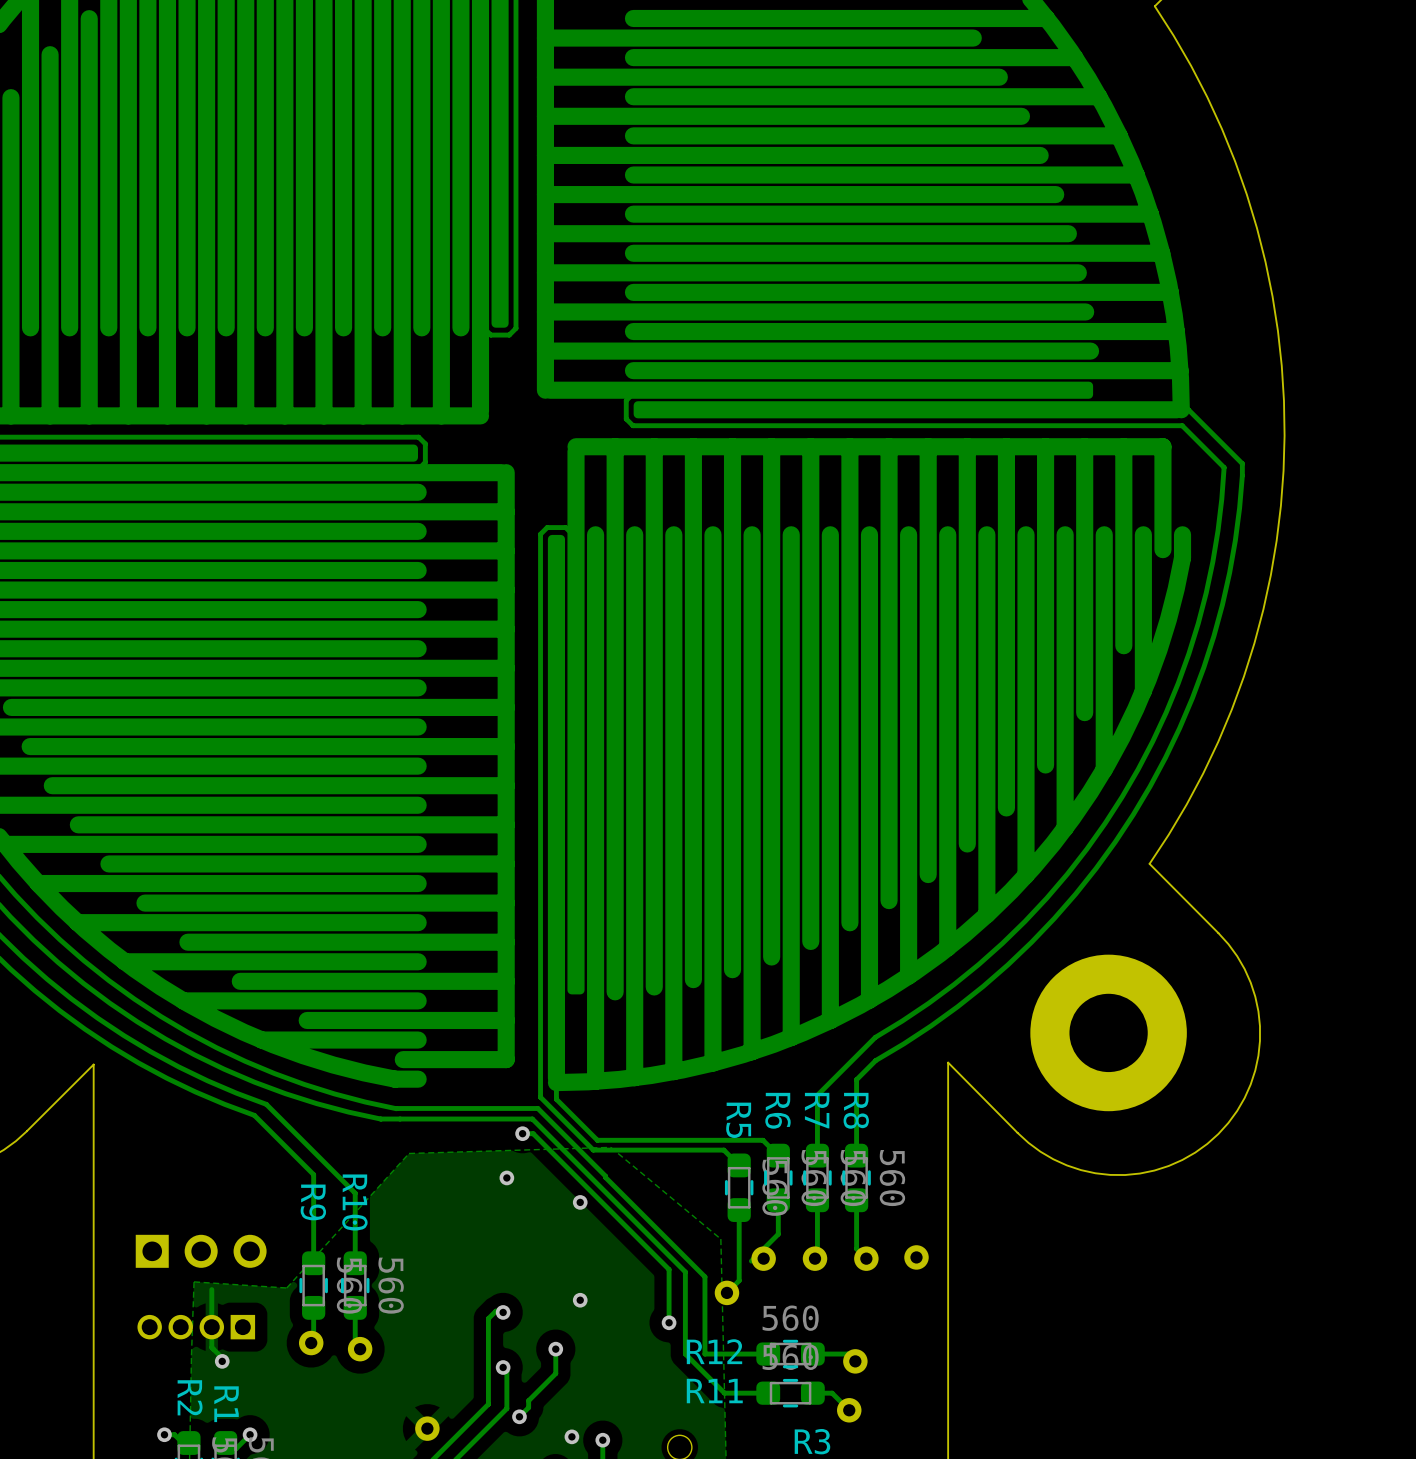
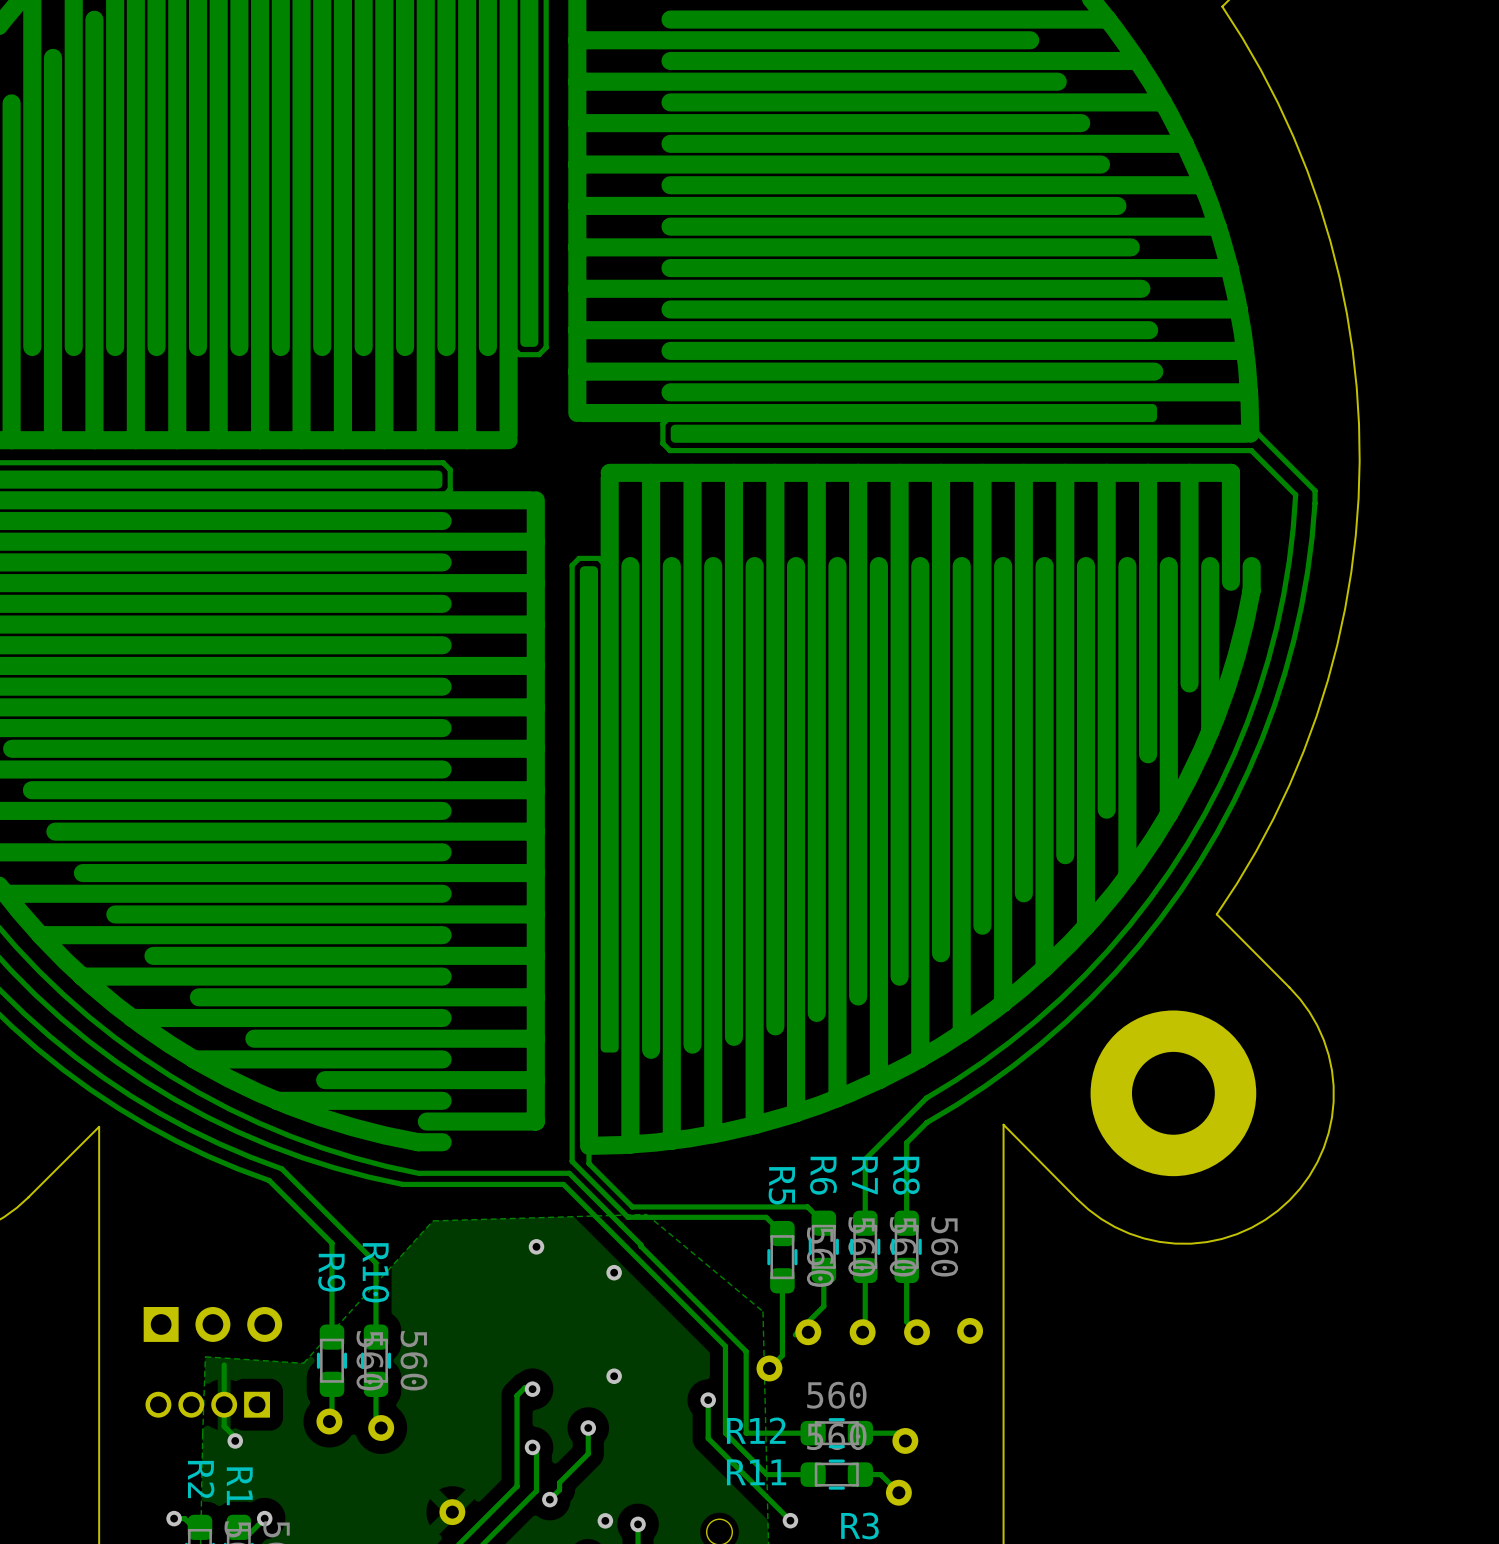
track: (522, 1133) (533, 1133) (669, 1269) (669, 1322) -> (790, 1520) (708, 1438) (708, 1400)
via: (522, 1133) -> none
via: none -> (790, 1520)

